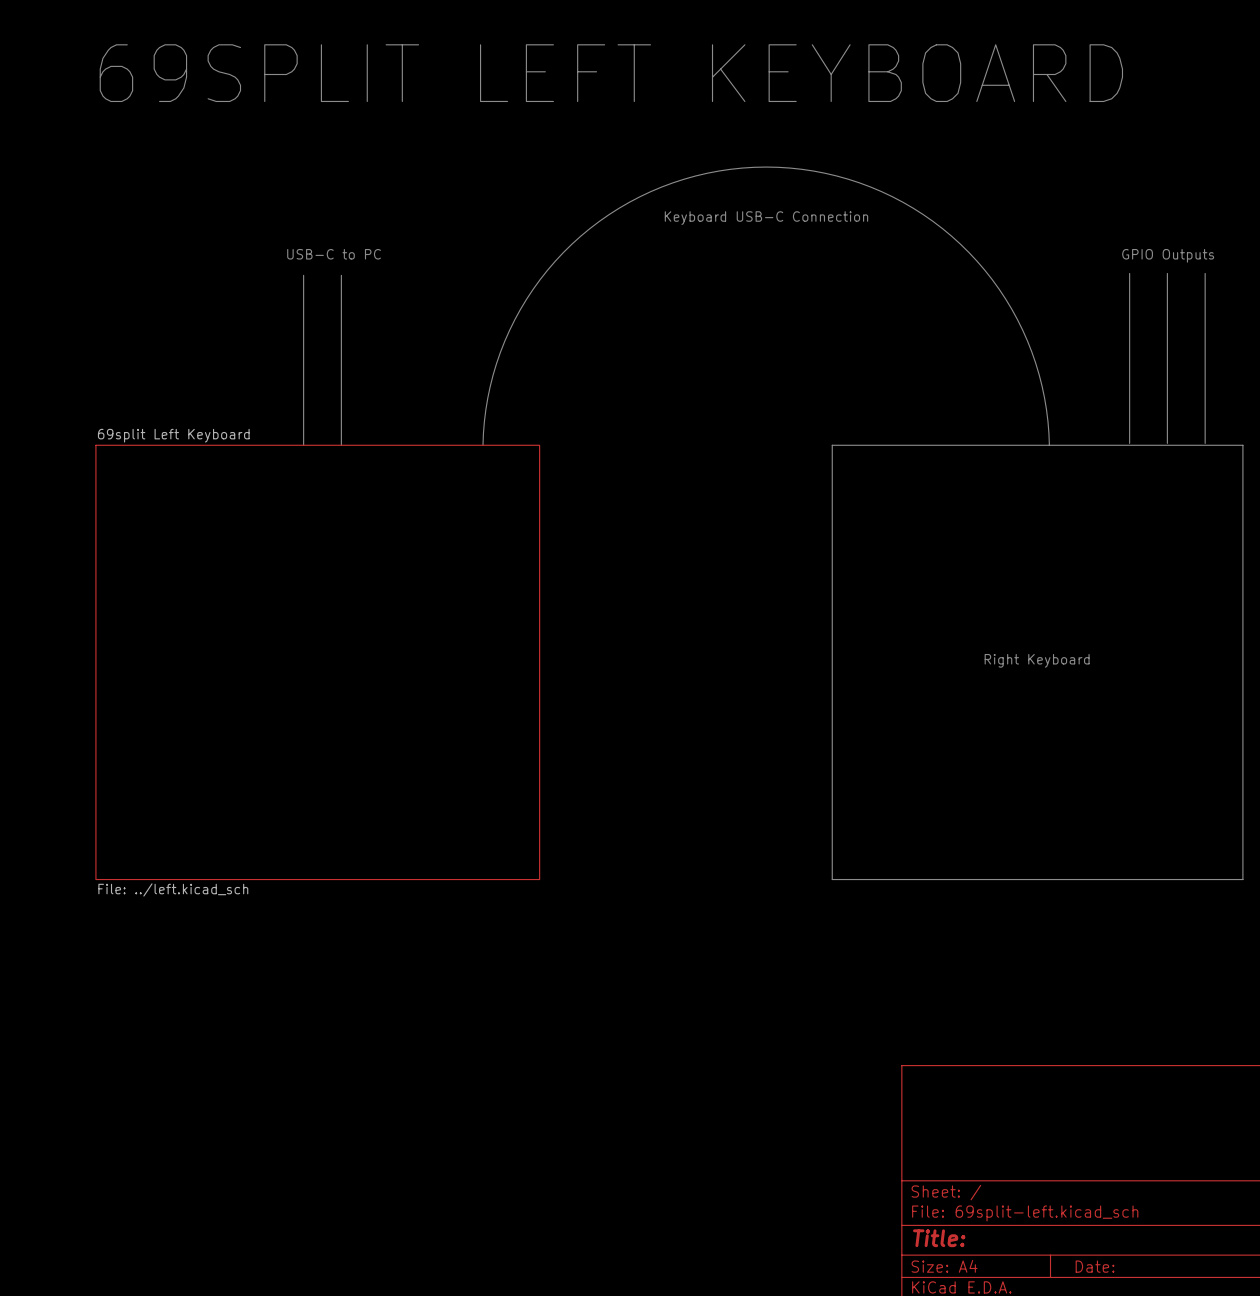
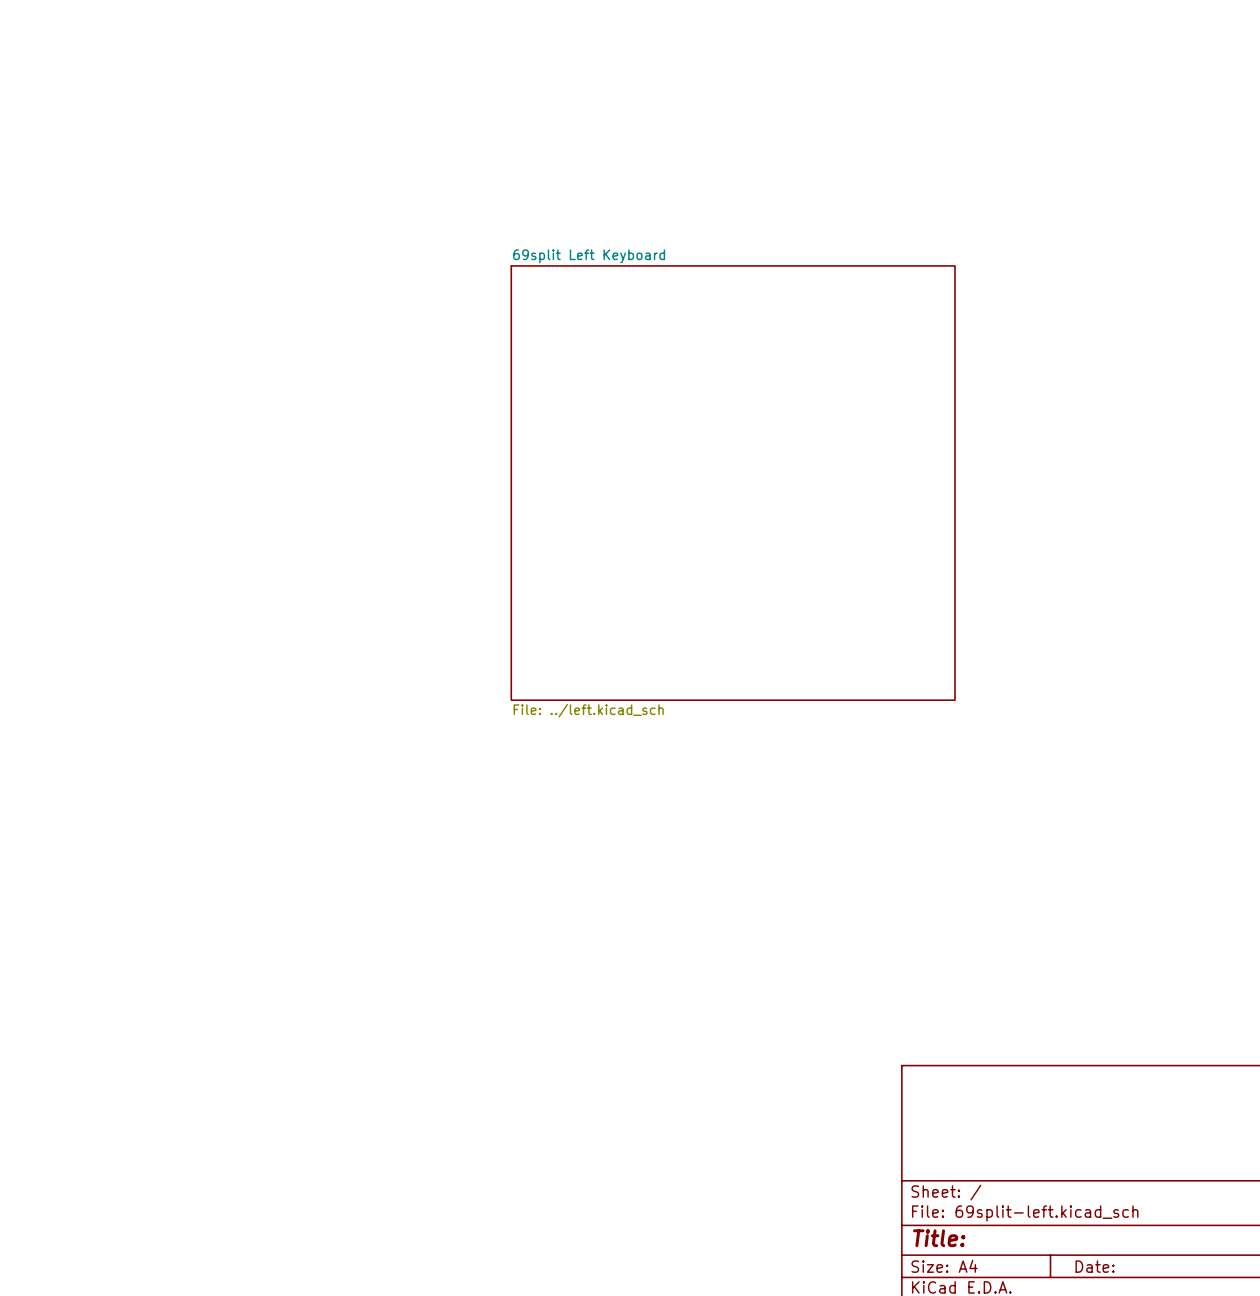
text: 69SPLIT LEFT KEYBOARD (611, 73) -> none
text: Keyboard USB-C Connection (766, 218) -> none
text: USB-C to PC (334, 254) -> none
text: GPIO Outputs (1168, 255) -> none
line: (1129, 273) (1129, 443) -> none
line: (1167, 273) (1167, 443) -> none
line: (1205, 273) (1205, 443) -> none
line: (303, 275) (303, 445) -> none
line: (341, 275) (341, 445) -> none
line: (482, 445) (490, 386) (504, 341) (533, 289) (571, 244) (609, 214) (661, 187) (718, 171) (766, 167) (813, 171) (870, 187) (923, 214) (960, 244) (999, 289) (1027, 341) (1042, 386) (1049, 445) -> none
line: (832, 445) (1242, 445) (1242, 879) (832, 879) (832, 445) -> none
text: Right Keyboard (1037, 660) -> none
sheet 69split Left Keyboard position: (317, 662) -> (733, 483)

